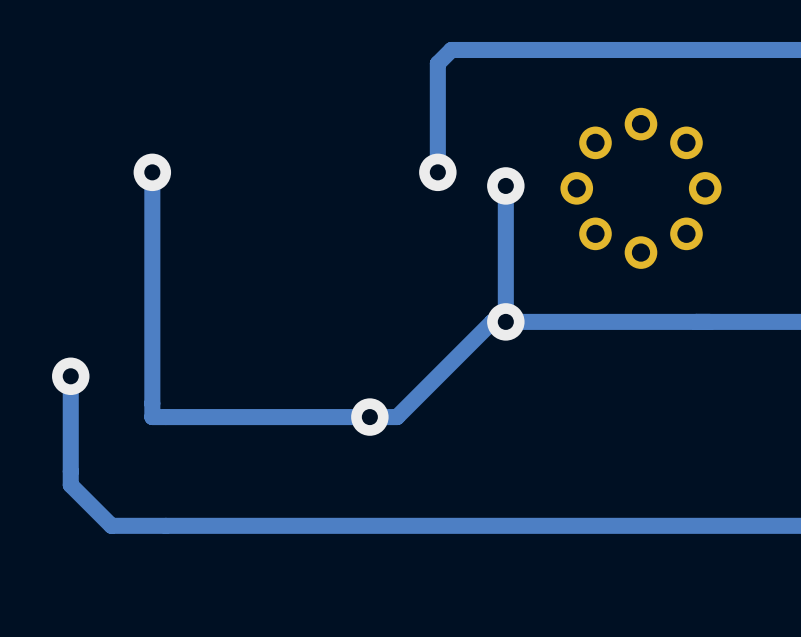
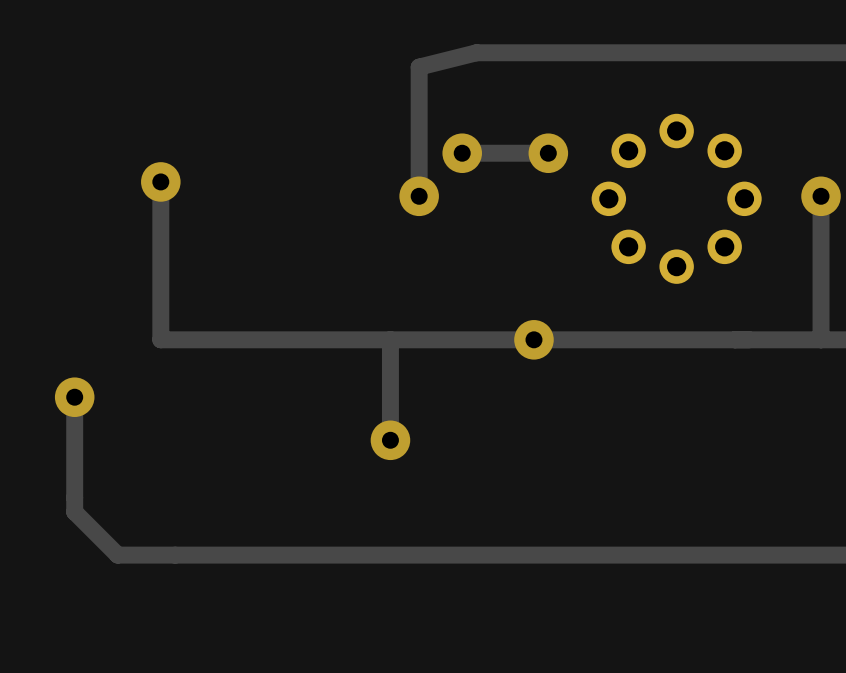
track: (451, 49) (437, 63) (437, 172) -> (476, 52) (419, 67) (419, 196)
via: none -> (462, 153)
track: none -> (548, 153) (462, 153)
via: none -> (548, 153)
via: (437, 172) -> none
via: none -> (419, 196)
track: (505, 185) (505, 321) -> (821, 196) (821, 339)
via: (505, 185) -> none
via: none -> (821, 196)
track: none -> (390, 339) (390, 440)
track: (492, 321) (397, 417) (152, 417) (152, 321) -> (519, 339) (160, 339)

